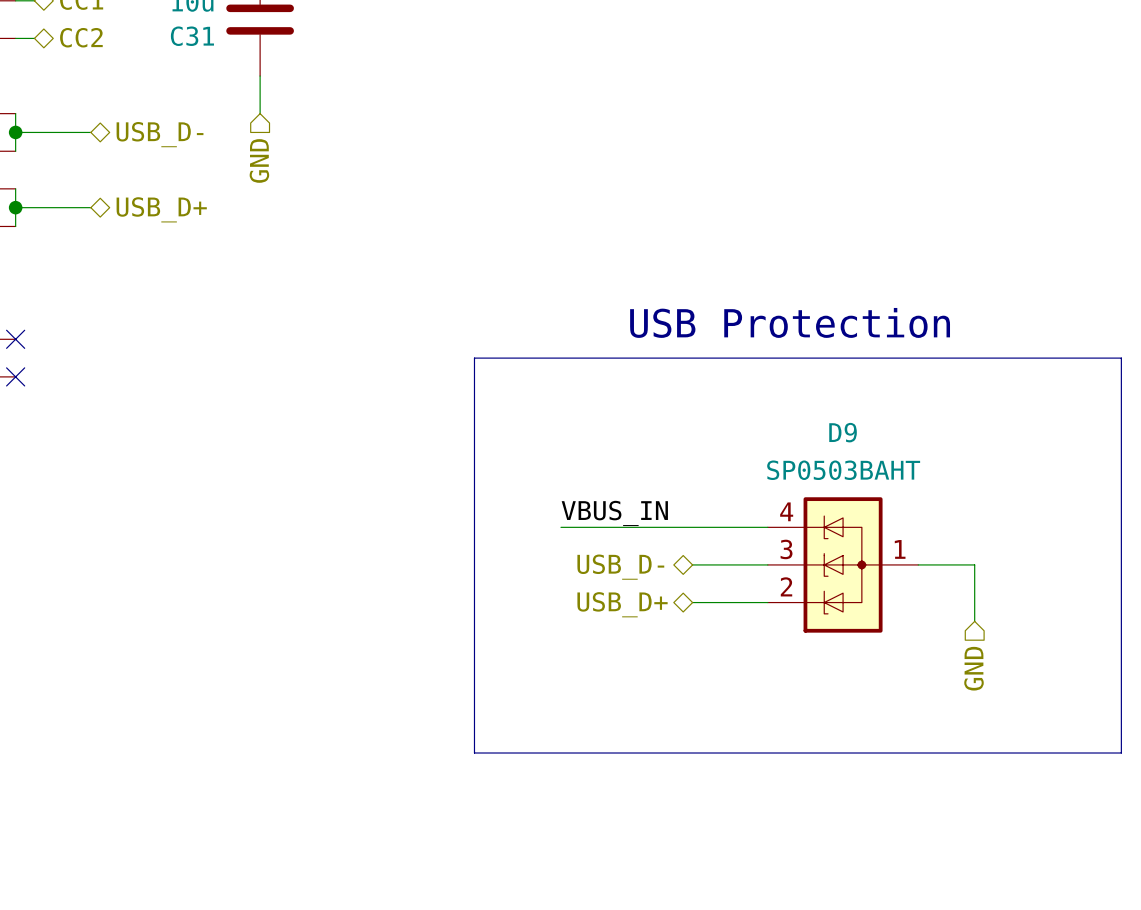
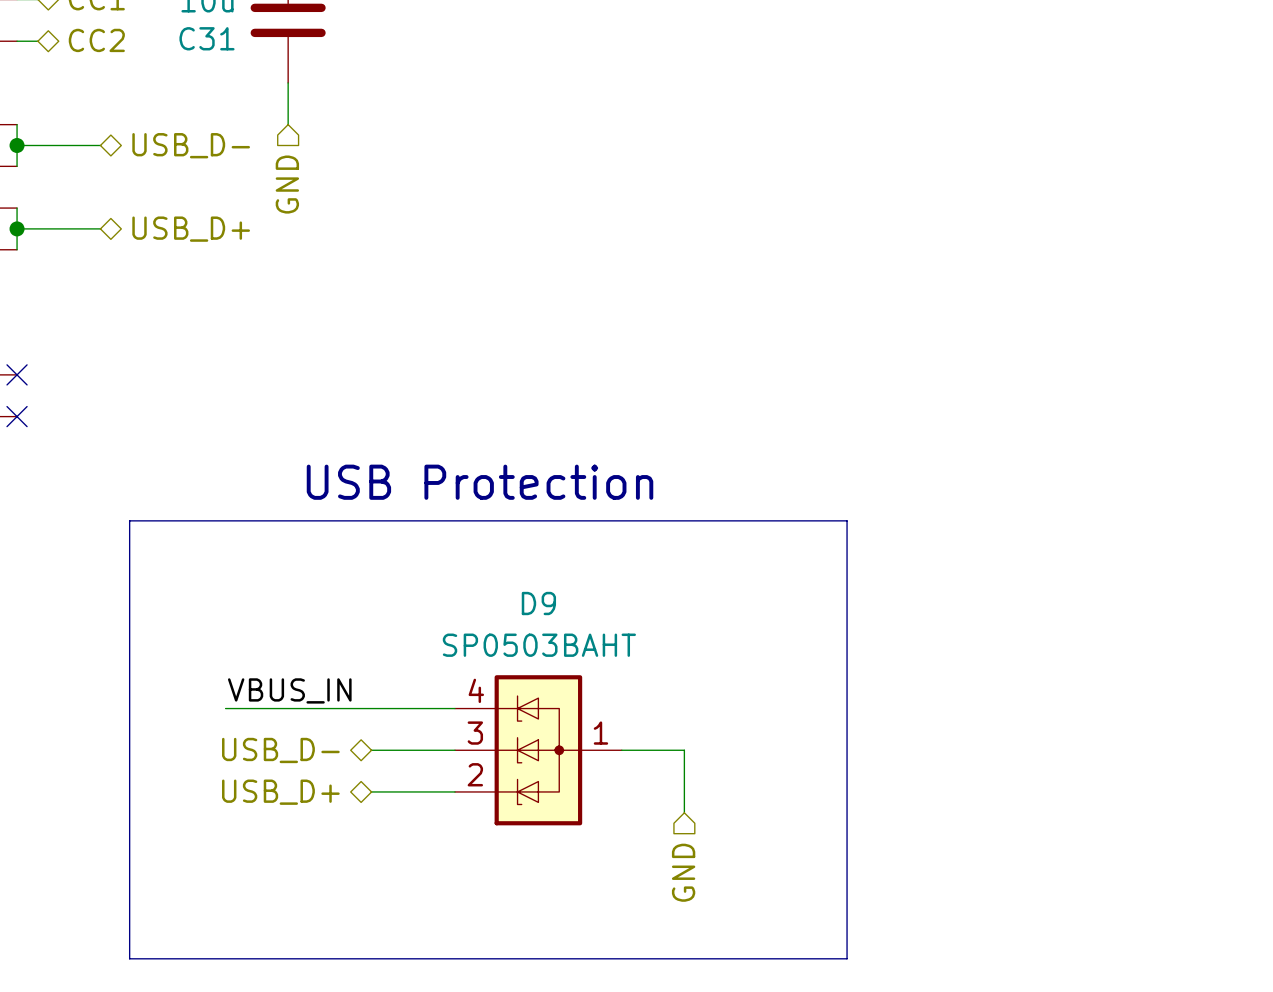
text: USB Protection (790, 322) -> none
line: (474, 358) (1121, 358) (1121, 753) (474, 753) (474, 358) -> none
text: none -> USB Protection (480, 482)
line: none -> (129, 520) (847, 520) (847, 958) (129, 958) (129, 520)
label: VBUS_IN (614, 513) -> none
wire: (560, 527) (767, 527) -> none
wire: (692, 564) (767, 564) -> none
D9 position: (843, 564) -> (538, 750)
wire: (918, 564) (974, 564) (974, 621) -> none
hierarchical label: USB_D- (620, 567) -> none
wire: (692, 602) (767, 602) -> (371, 750) (454, 750)
hierarchical label: USB_D+ (622, 604) -> none
label: none -> VBUS_IN (289, 690)
wire: none -> (225, 708) (454, 708)
hierarchical label: GND (974, 668) -> none
wire: none -> (621, 750) (684, 750) (684, 812)
hierarchical label: none -> USB_D- (280, 750)
wire: none -> (371, 791) (454, 791)
hierarchical label: none -> USB_D+ (280, 792)
hierarchical label: none -> GND (683, 872)

